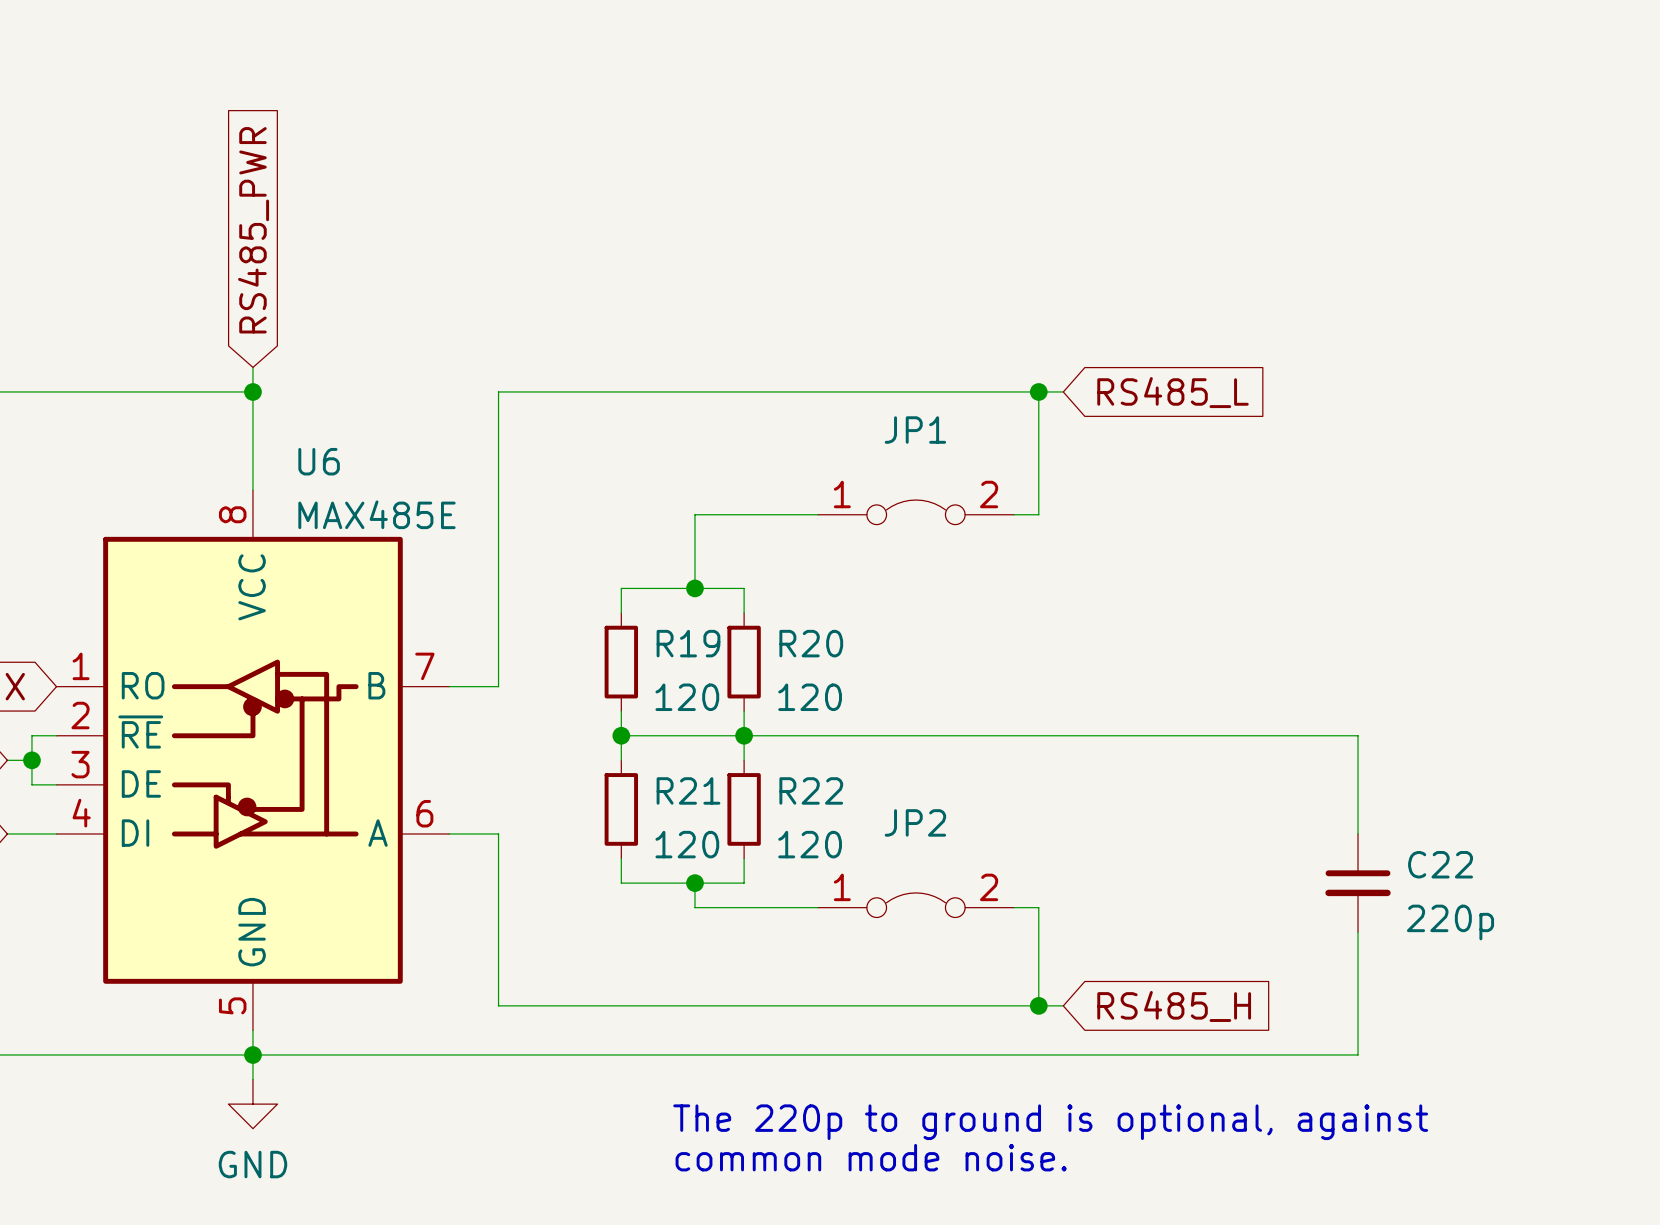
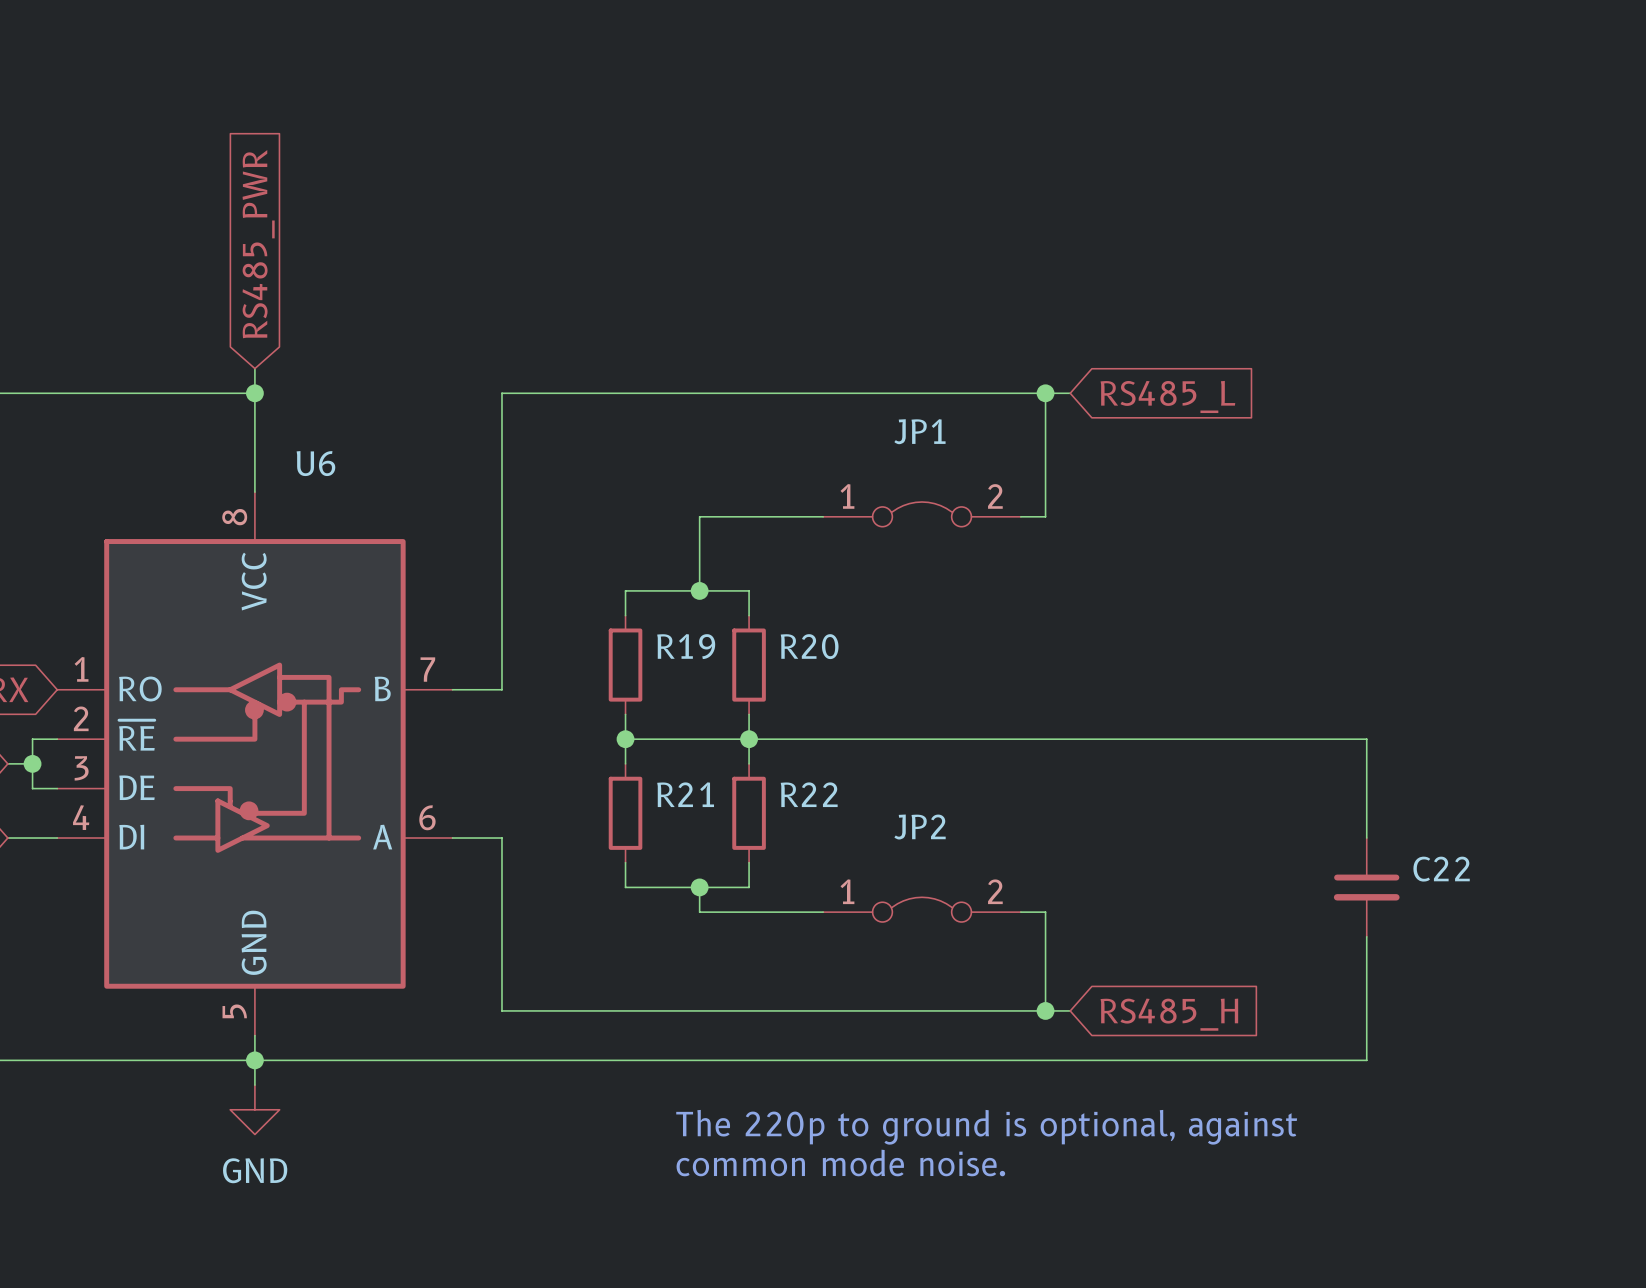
U6 value: MAX485E (376, 514) -> none
R19 value: 120 (687, 697) -> none
R20 value: 120 (810, 697) -> none
R21 value: 120 (687, 844) -> none
R22 value: 120 (810, 844) -> none
C22 value: 220p (1450, 922) -> none

